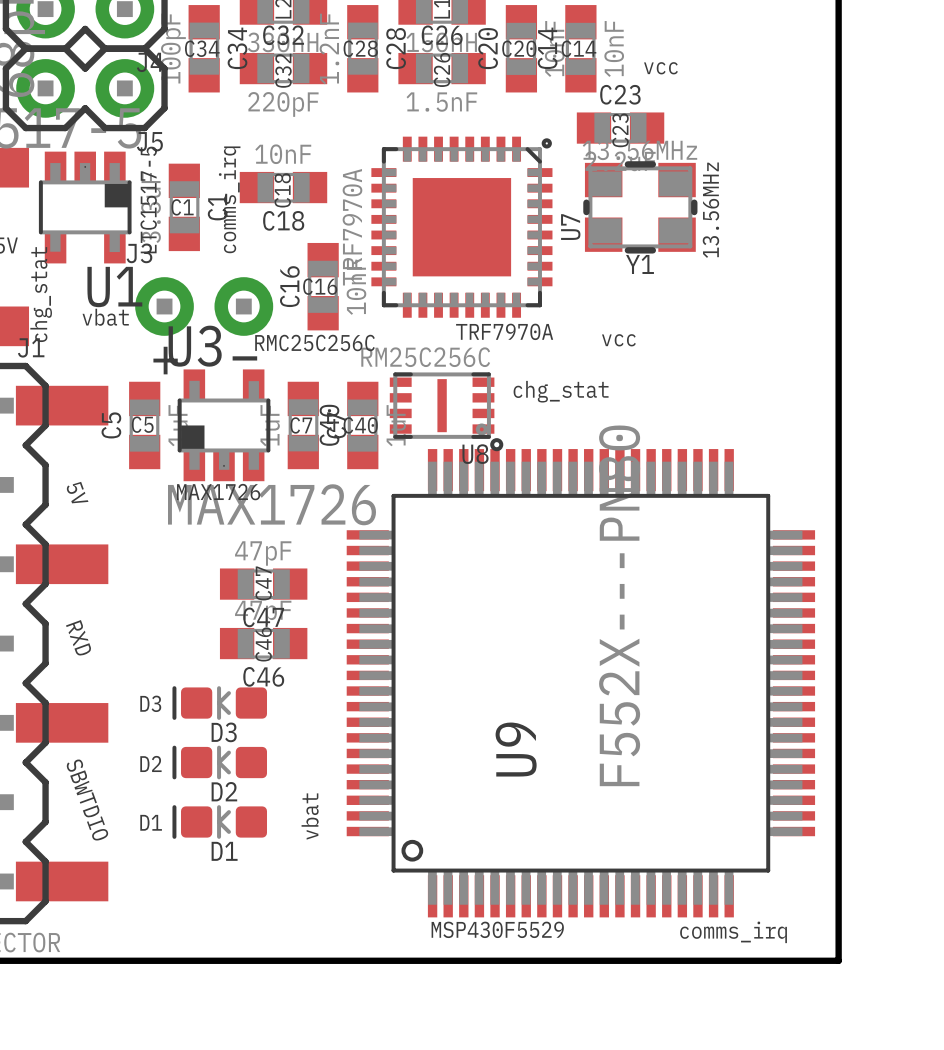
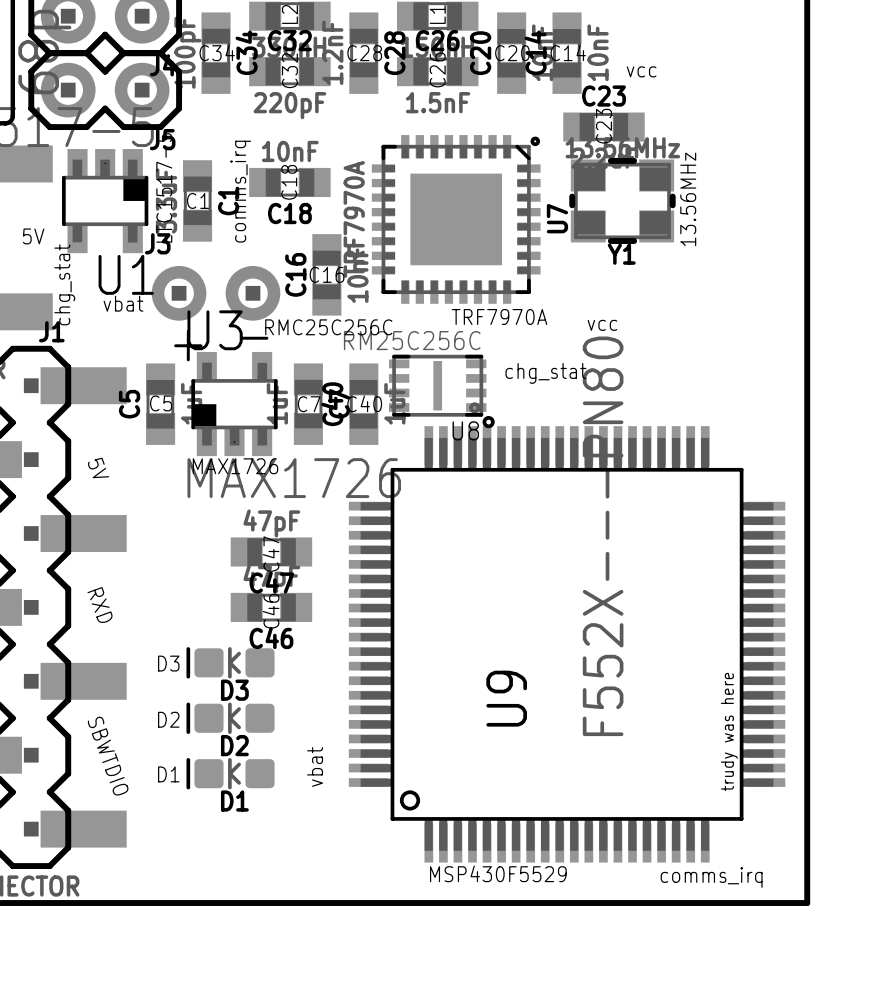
text: none -> trudy was here (729, 731)

